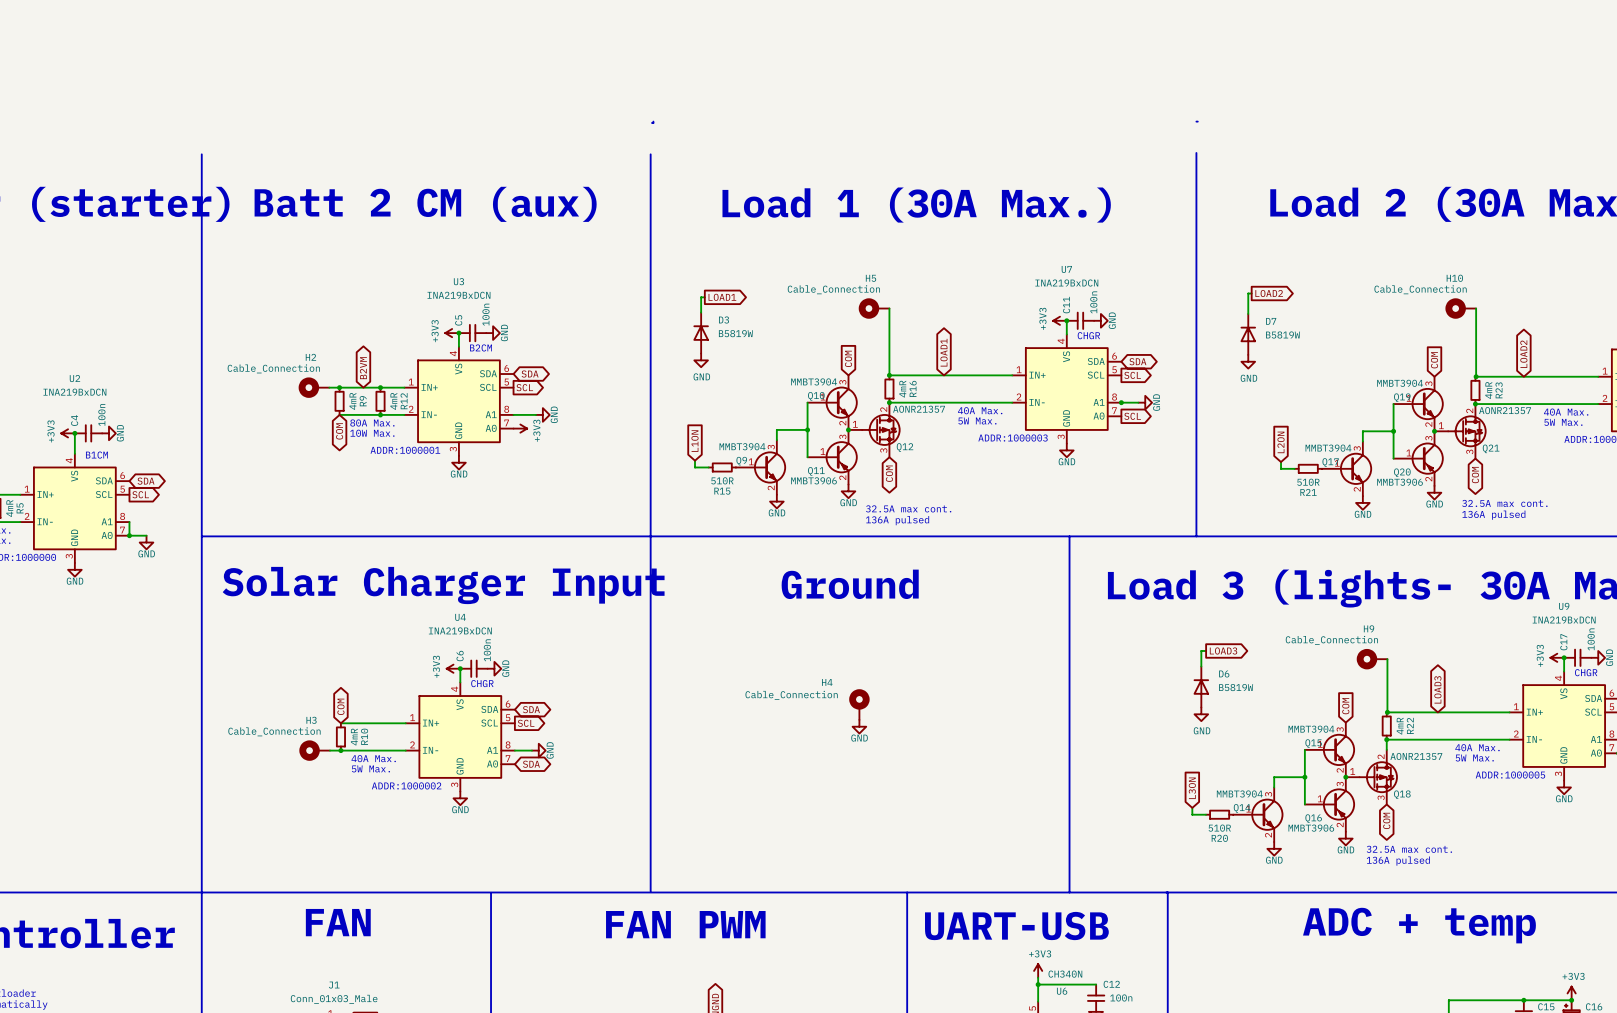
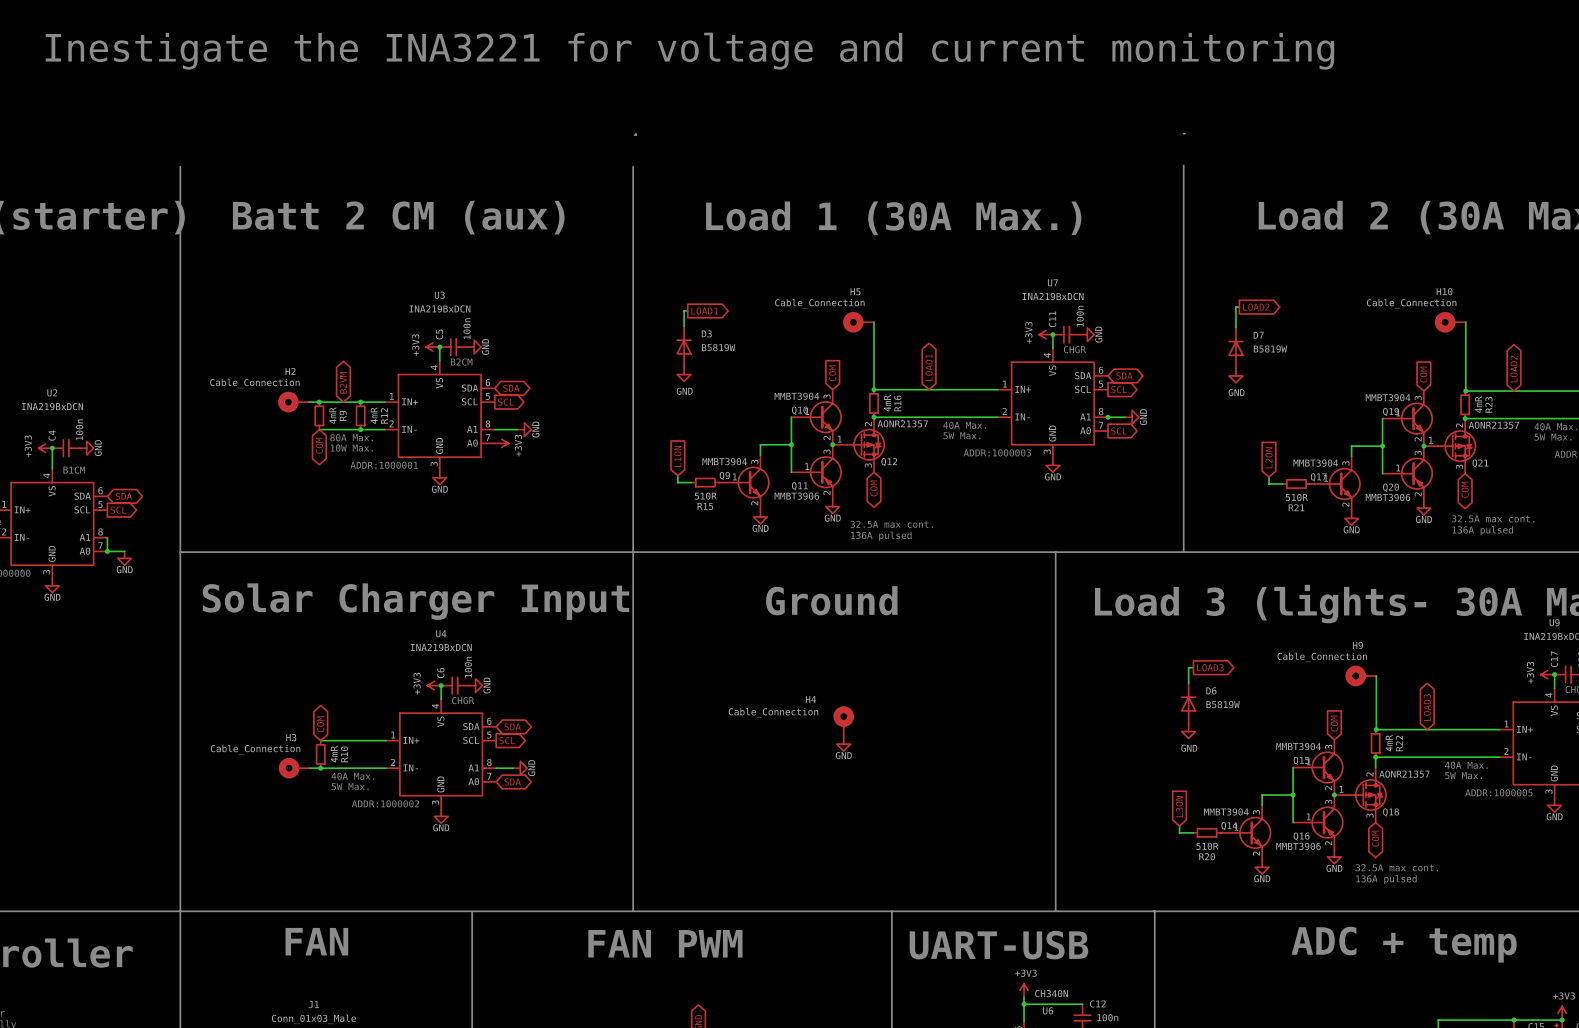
text: none -> Inestigate the INA3221 for voltage and current monitoring (689, 51)

